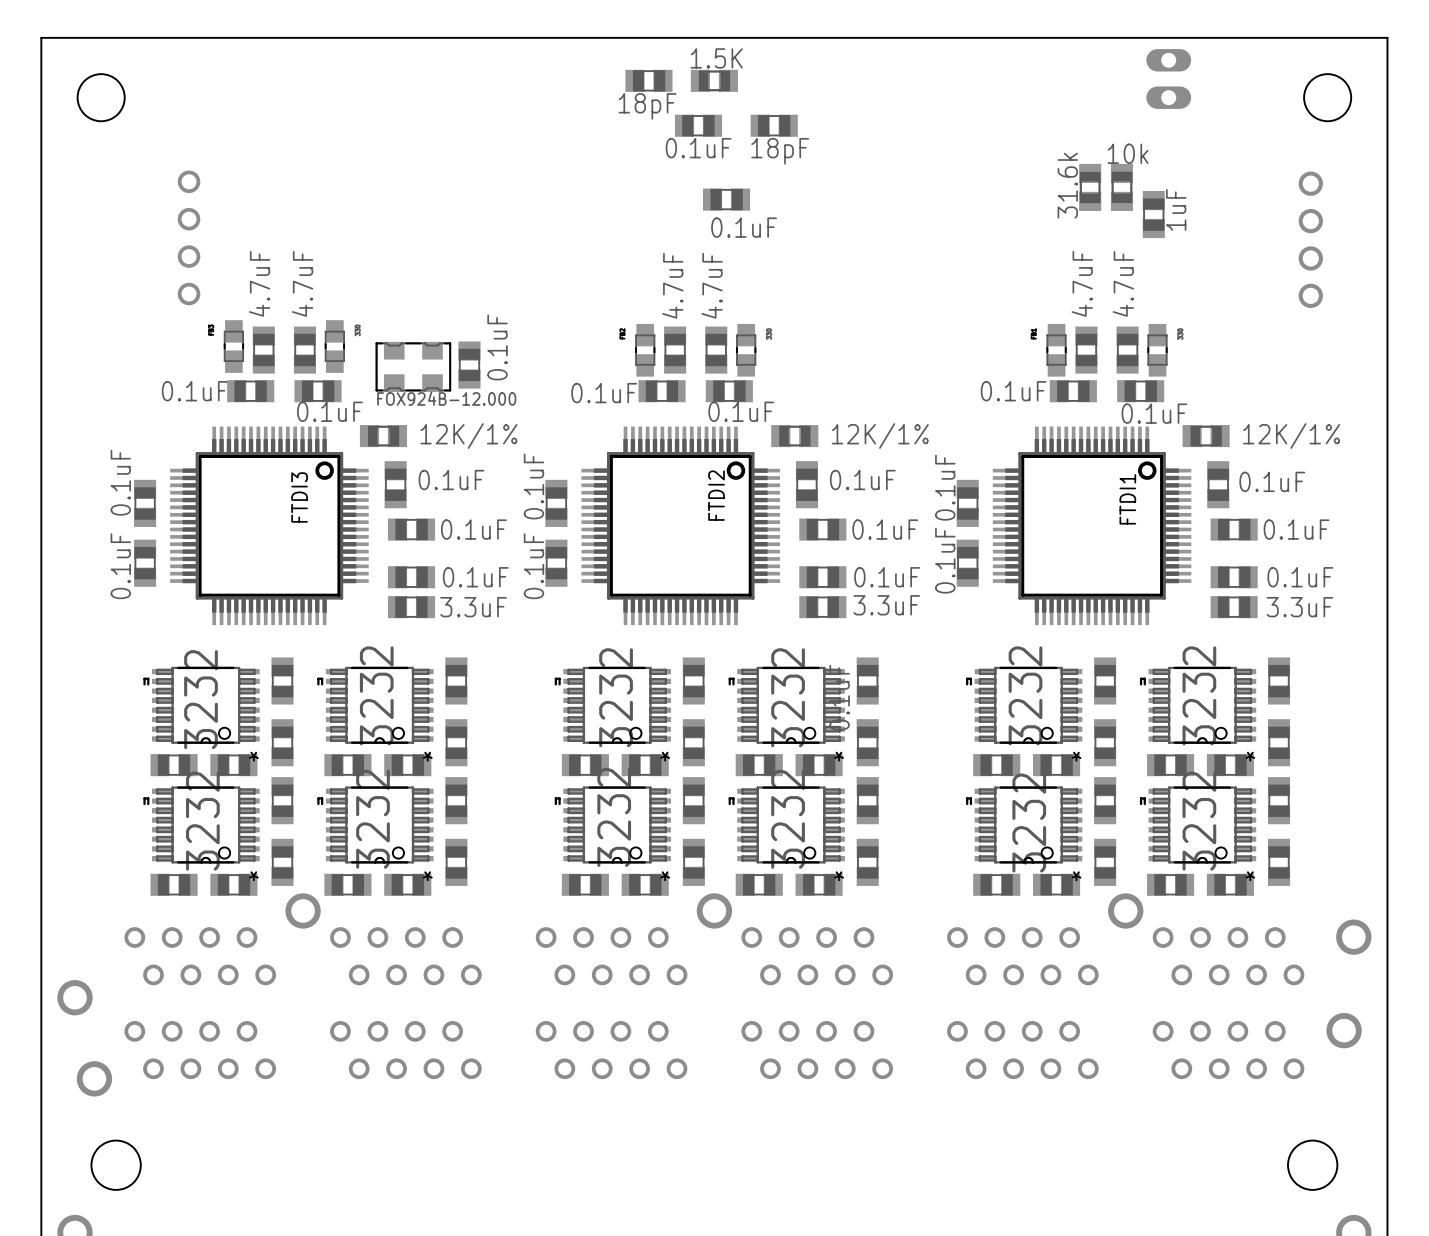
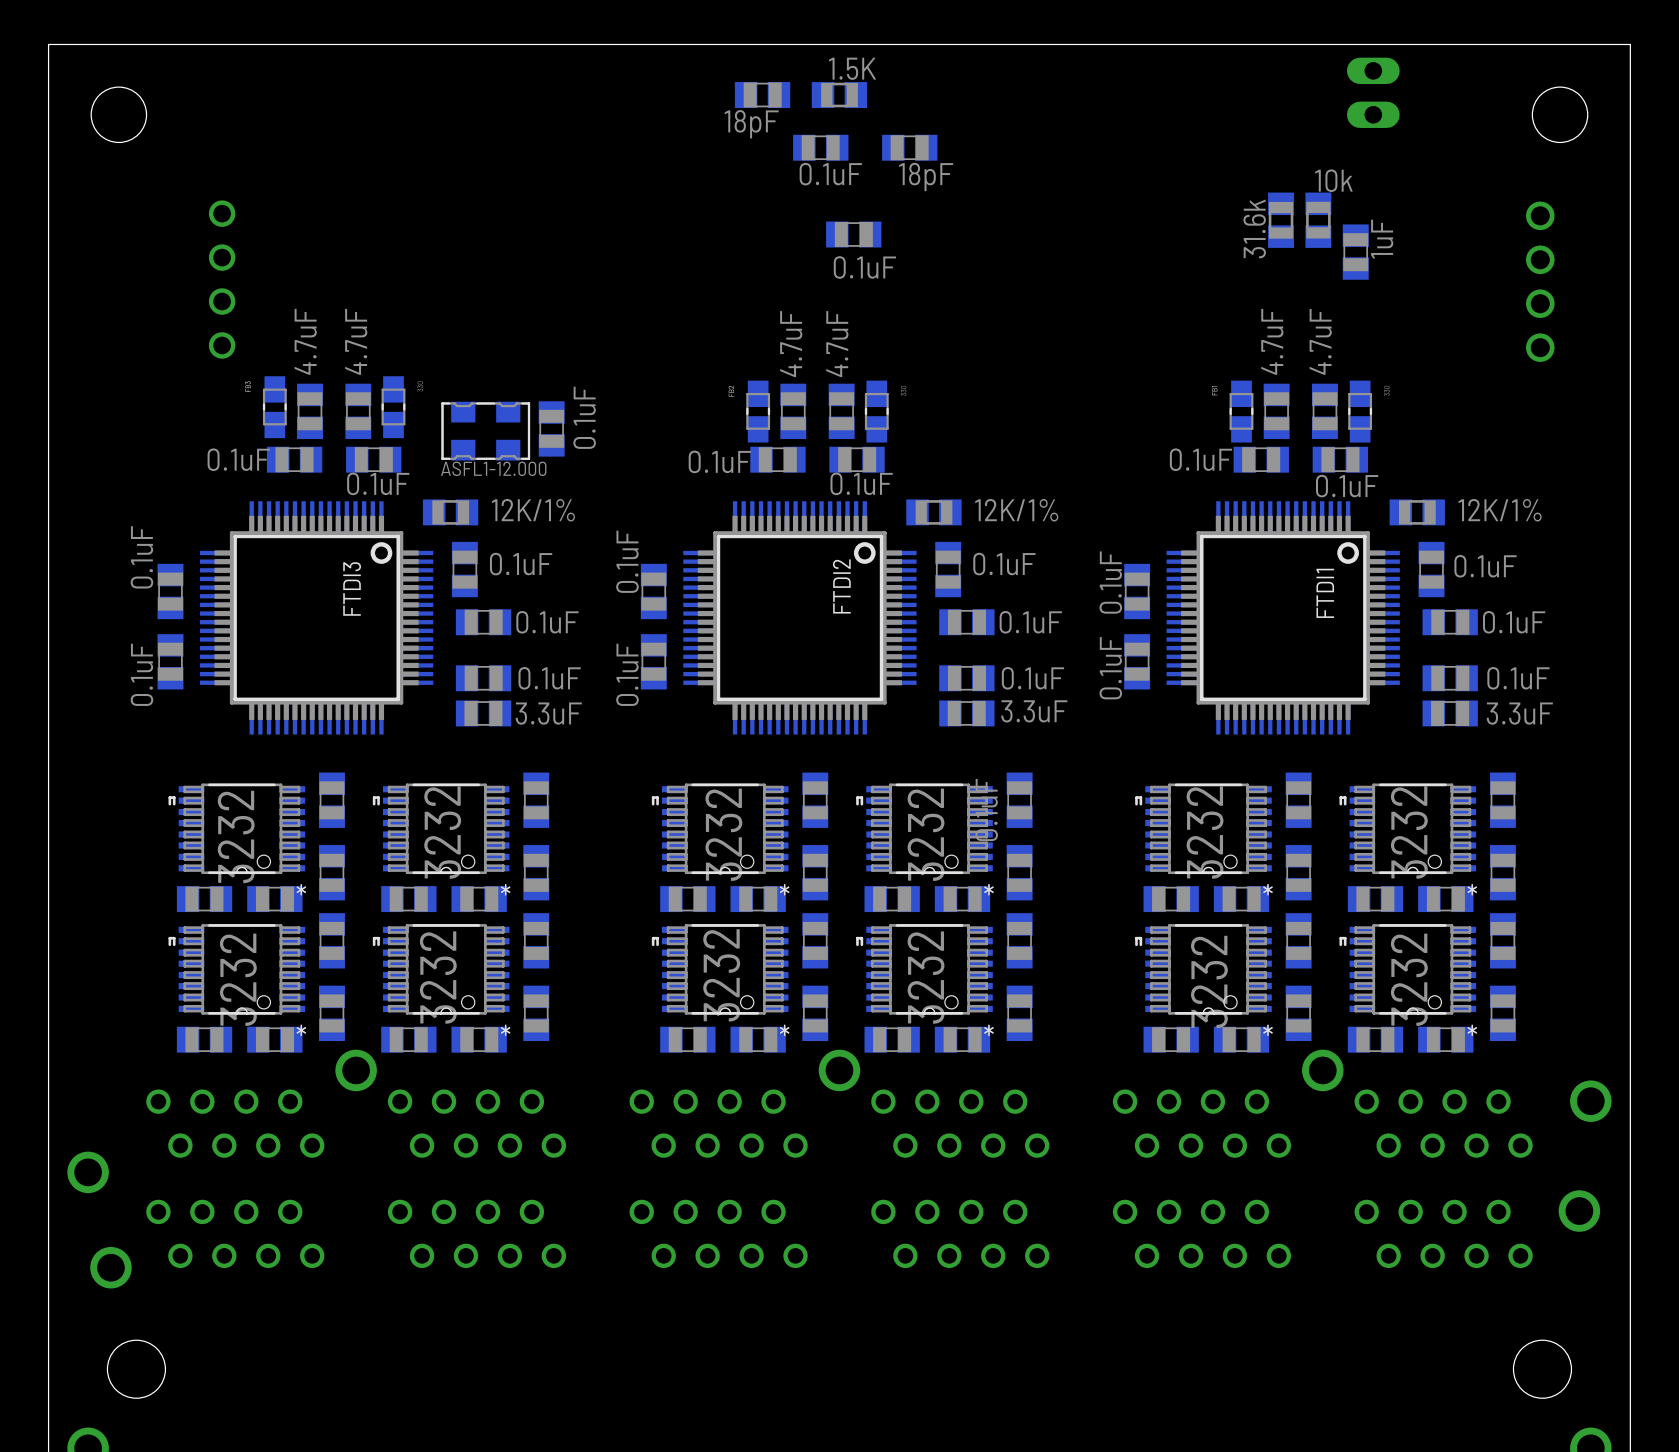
part value: FOX924B-12.000 (446, 398) -> ASFL1-12.000 (493, 468)

